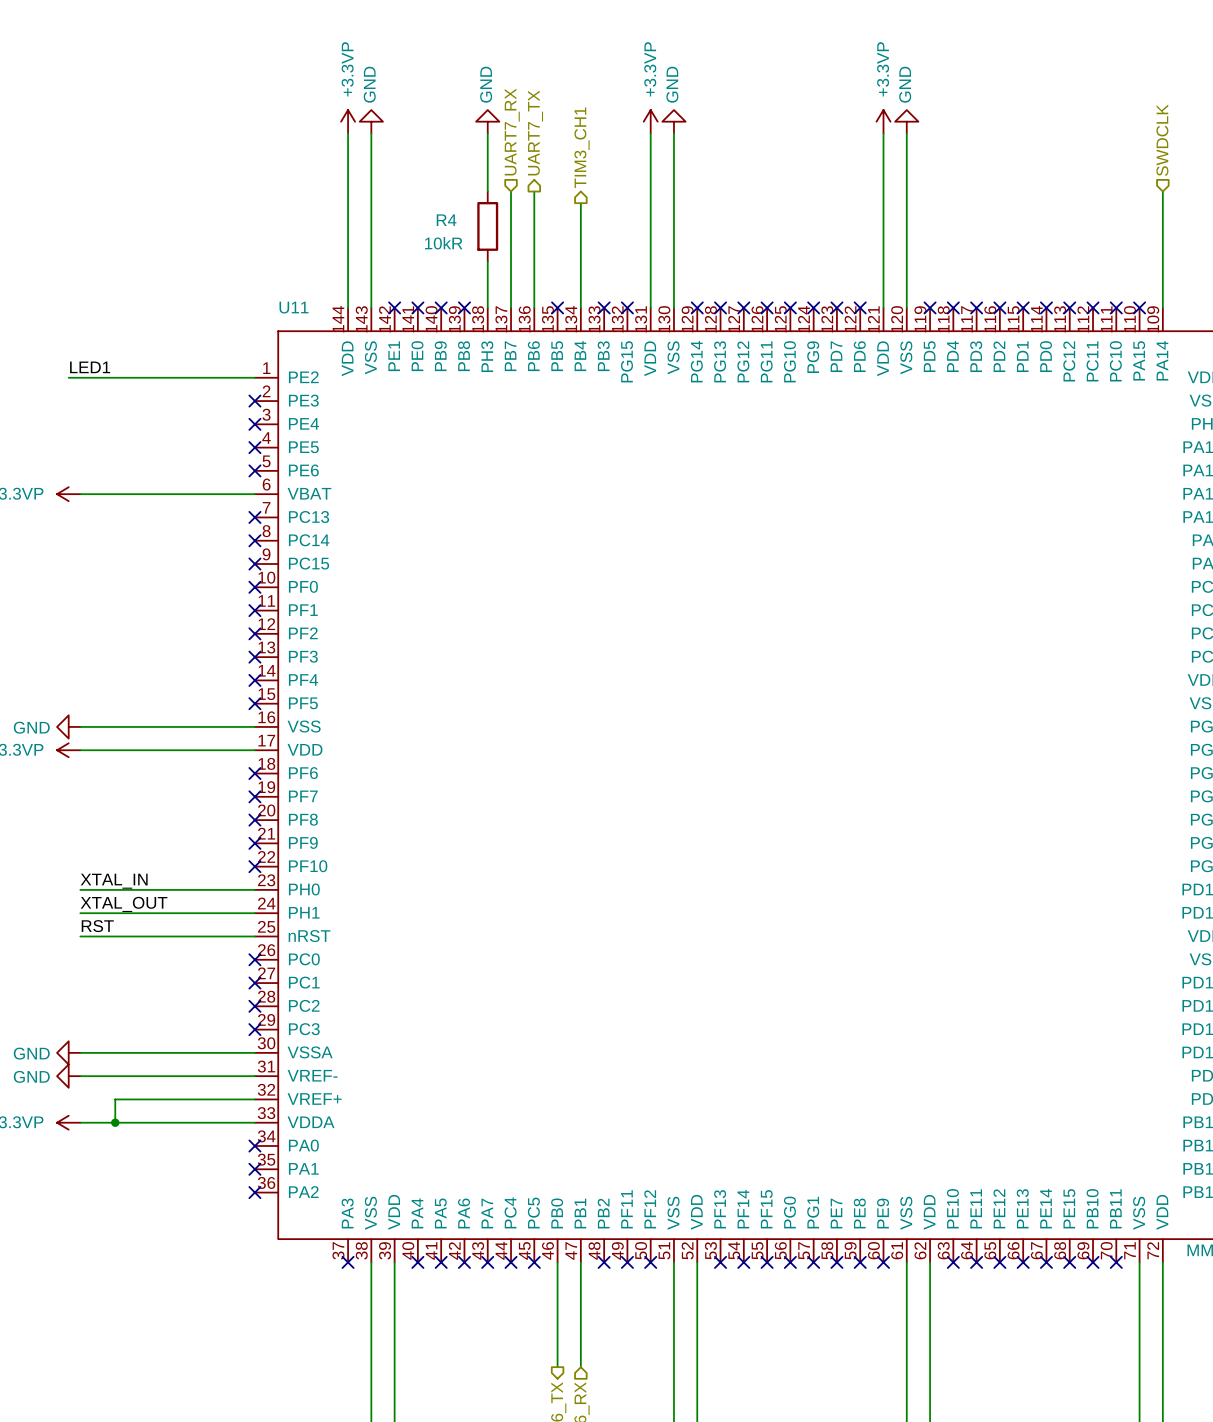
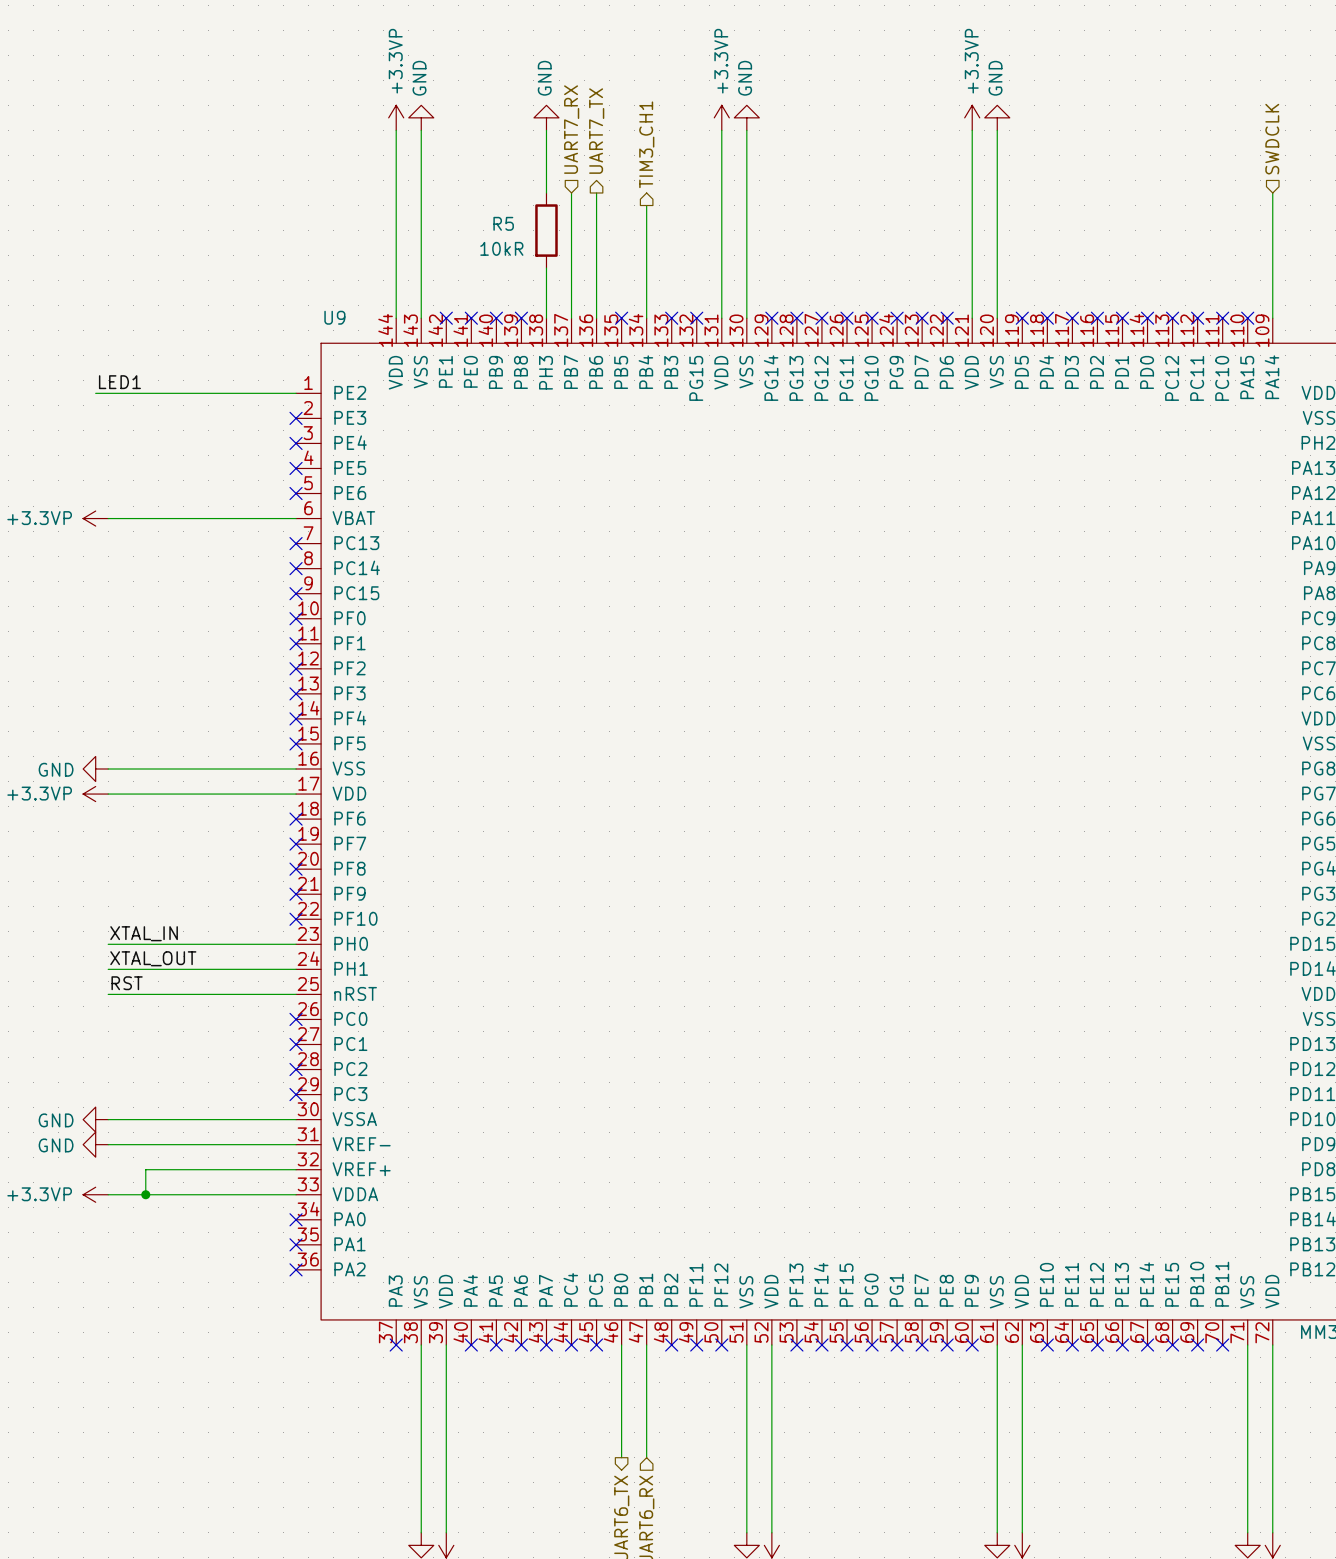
R4 name: R4 (446, 220) -> R5 (503, 223)
U11 name: U11 (293, 307) -> U9 (334, 317)

